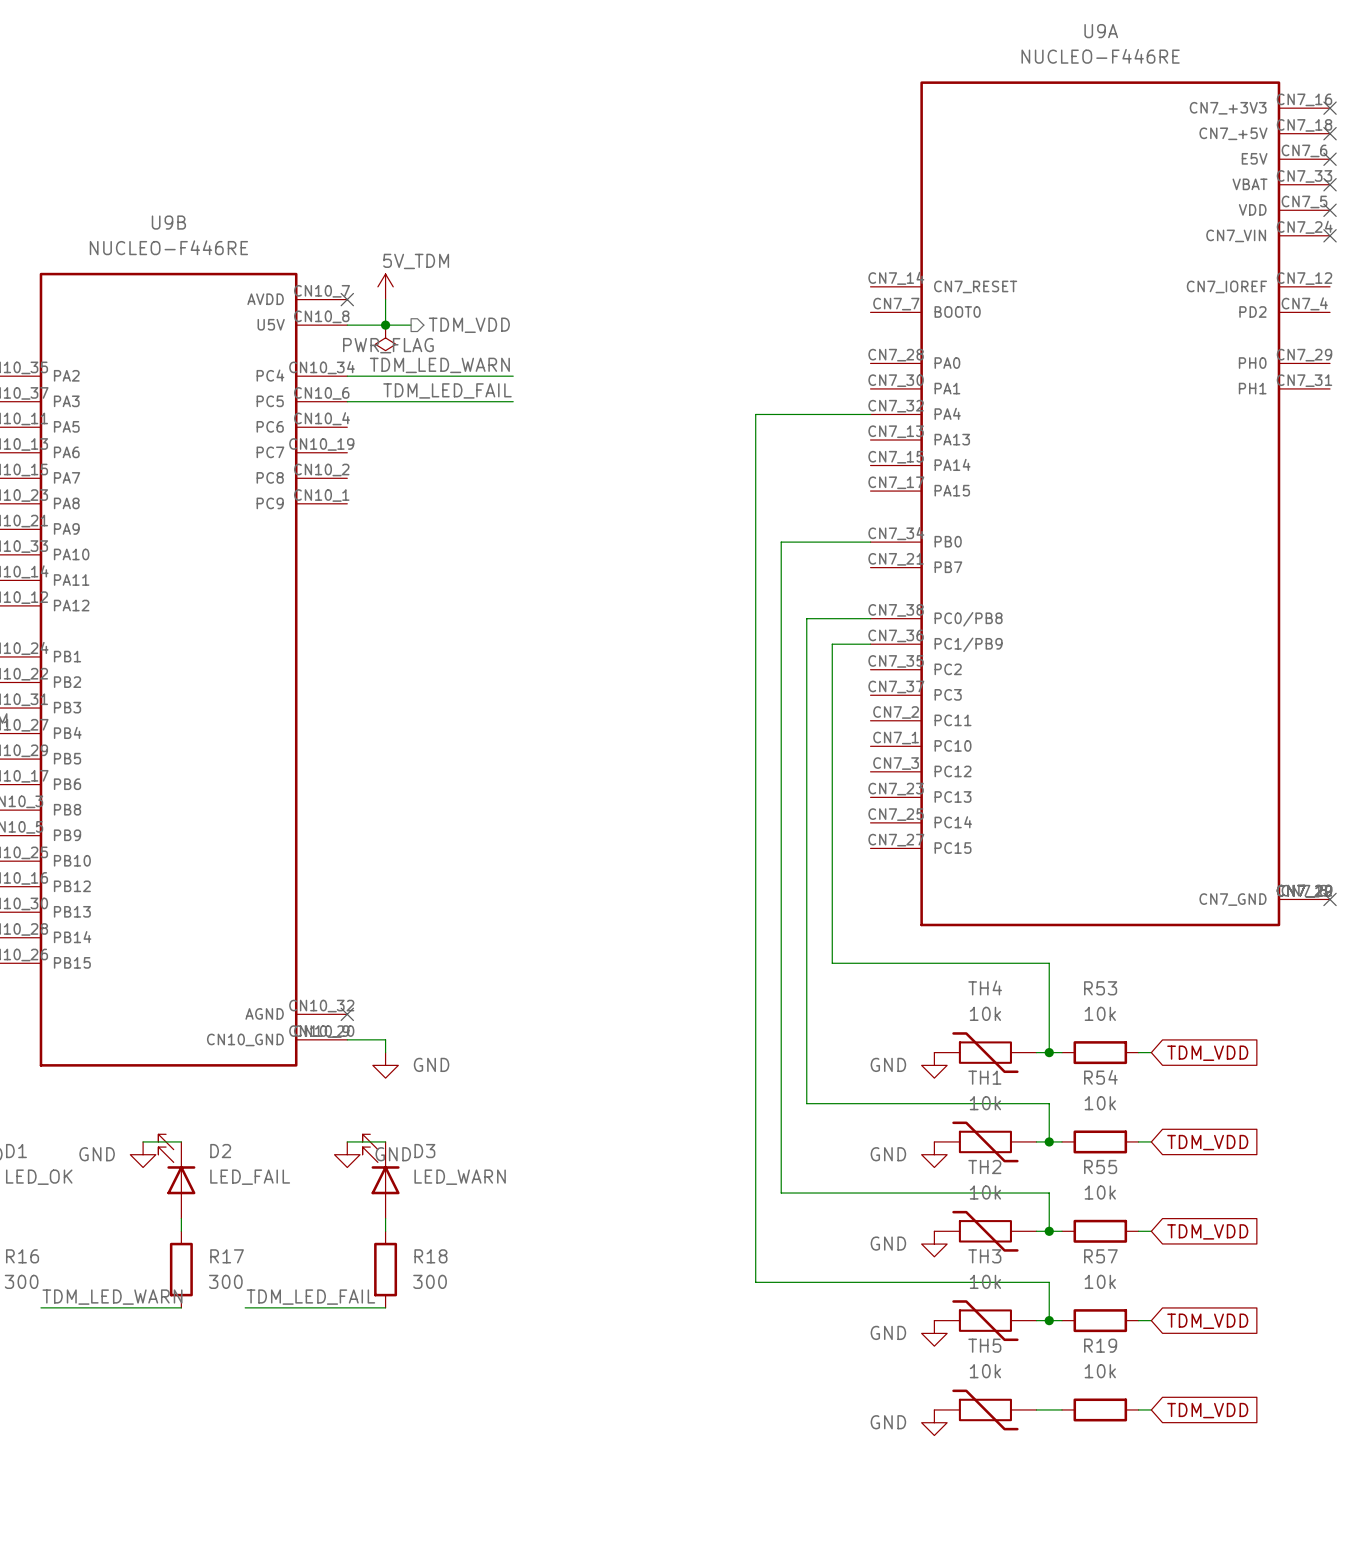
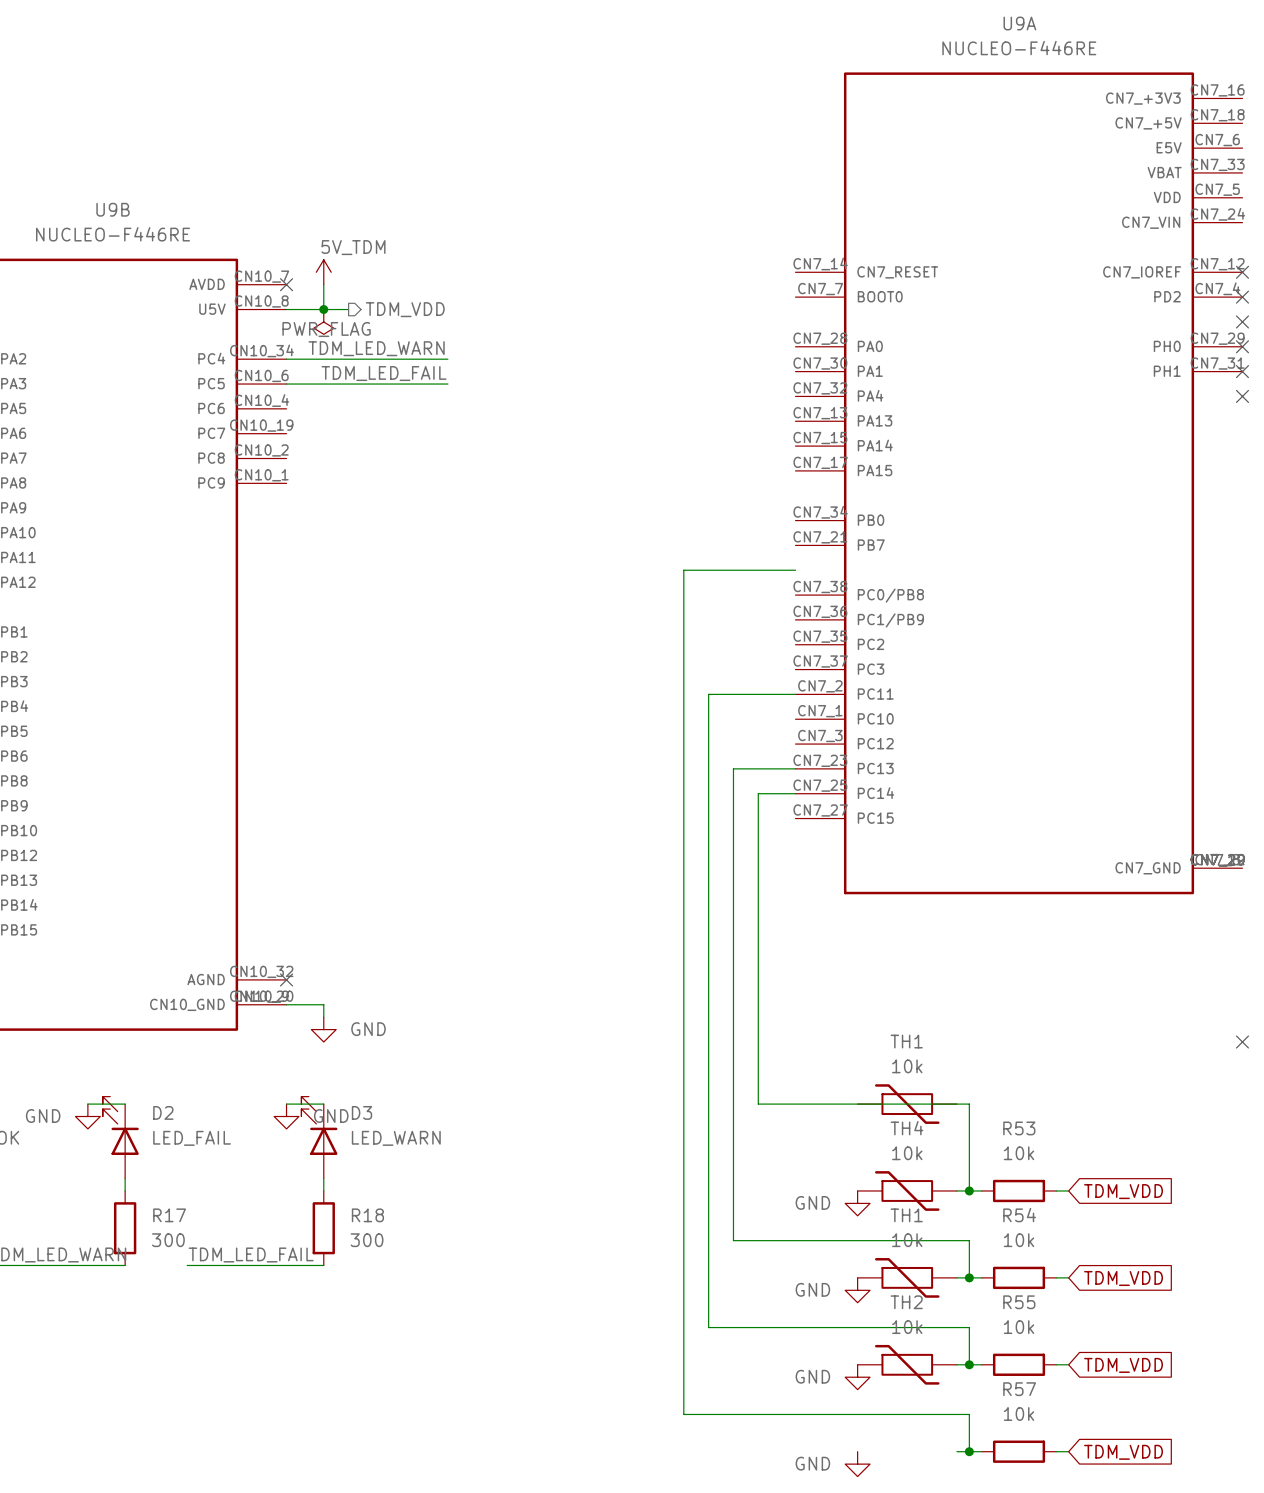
no-connect mark: (1330, 108) -> none
no-connect mark: (1330, 133) -> none
no-connect mark: (1330, 159) -> none
no-connect mark: (1330, 184) -> none
no-connect mark: (1330, 210) -> none
no-connect mark: (1330, 235) -> none
no-connect mark: none -> (1242, 272)
no-connect mark: none -> (1242, 297)
no-connect mark: none -> (1242, 321)
no-connect mark: none -> (1242, 346)
no-connect mark: none -> (1242, 371)
wire: (870, 414) (755, 414) (755, 593) -> (795, 570) (683, 570)
no-connect mark: none -> (1242, 396)
wire: (870, 542) (781, 542) (781, 720) -> (795, 694) (708, 694)
wire: (870, 618) (806, 618) (806, 797) -> (795, 768) (733, 768)
wire: (870, 644) (832, 644) (832, 822) -> (795, 793) (758, 793)
no-connect mark: (1330, 899) -> none
wire: (832, 963) (1049, 963) (1049, 1052) -> (758, 930) (758, 1104) (956, 1104)
TH4: 10k (985, 1052) -> none
wire: (1036, 1052) (1062, 1052) -> none
junction: (1049, 1052) -> none
R53: 10k (1100, 1052) -> none
wire: (1138, 1052) (1151, 1052) -> none
global label: TDM_VDD (1207, 1053) -> none
power symbol: GND (934, 1065) -> none
no-connect mark: none -> (1242, 1042)
wire: (806, 1103) (1049, 1103) (1049, 1141) (1062, 1141) -> none
wire: none -> (969, 1104) (969, 1153)
junction: (1049, 1141) -> none
R54: 10k (1100, 1141) -> none
wire: (1138, 1141) (1151, 1141) -> none
global label: TDM_VDD (1207, 1142) -> none
power symbol: GND (934, 1154) -> none
TH2 name: TH2 (984, 1167) -> TH4 (906, 1128)
R55 name: R55 (1100, 1167) -> R53 (1019, 1128)
wire: (781, 1193) (1049, 1193) -> (708, 1153) (708, 1327) (969, 1327) (969, 1364)
TH3 name: TH3 (984, 1256) -> TH1 (906, 1215)
R57 name: R57 (1100, 1256) -> R54 (1019, 1215)
wire: (755, 1282) (806, 1282) -> (733, 1066) (733, 1240)
wire: none -> (683, 1240) (683, 1414) (969, 1414) (969, 1451)
TH5 name: TH5 (984, 1345) -> TH2 (906, 1302)
R19 name: R19 (1100, 1345) -> R55 (1019, 1302)
junction: none -> (969, 1364)
wire: none -> (956, 1451) (981, 1451)
junction: none -> (969, 1451)
R57: none -> 10k (1019, 1451)
wire: none -> (1056, 1451) (1068, 1451)
global label: none -> TDM_VDD (1123, 1452)
power symbol: none -> GND (857, 1464)

